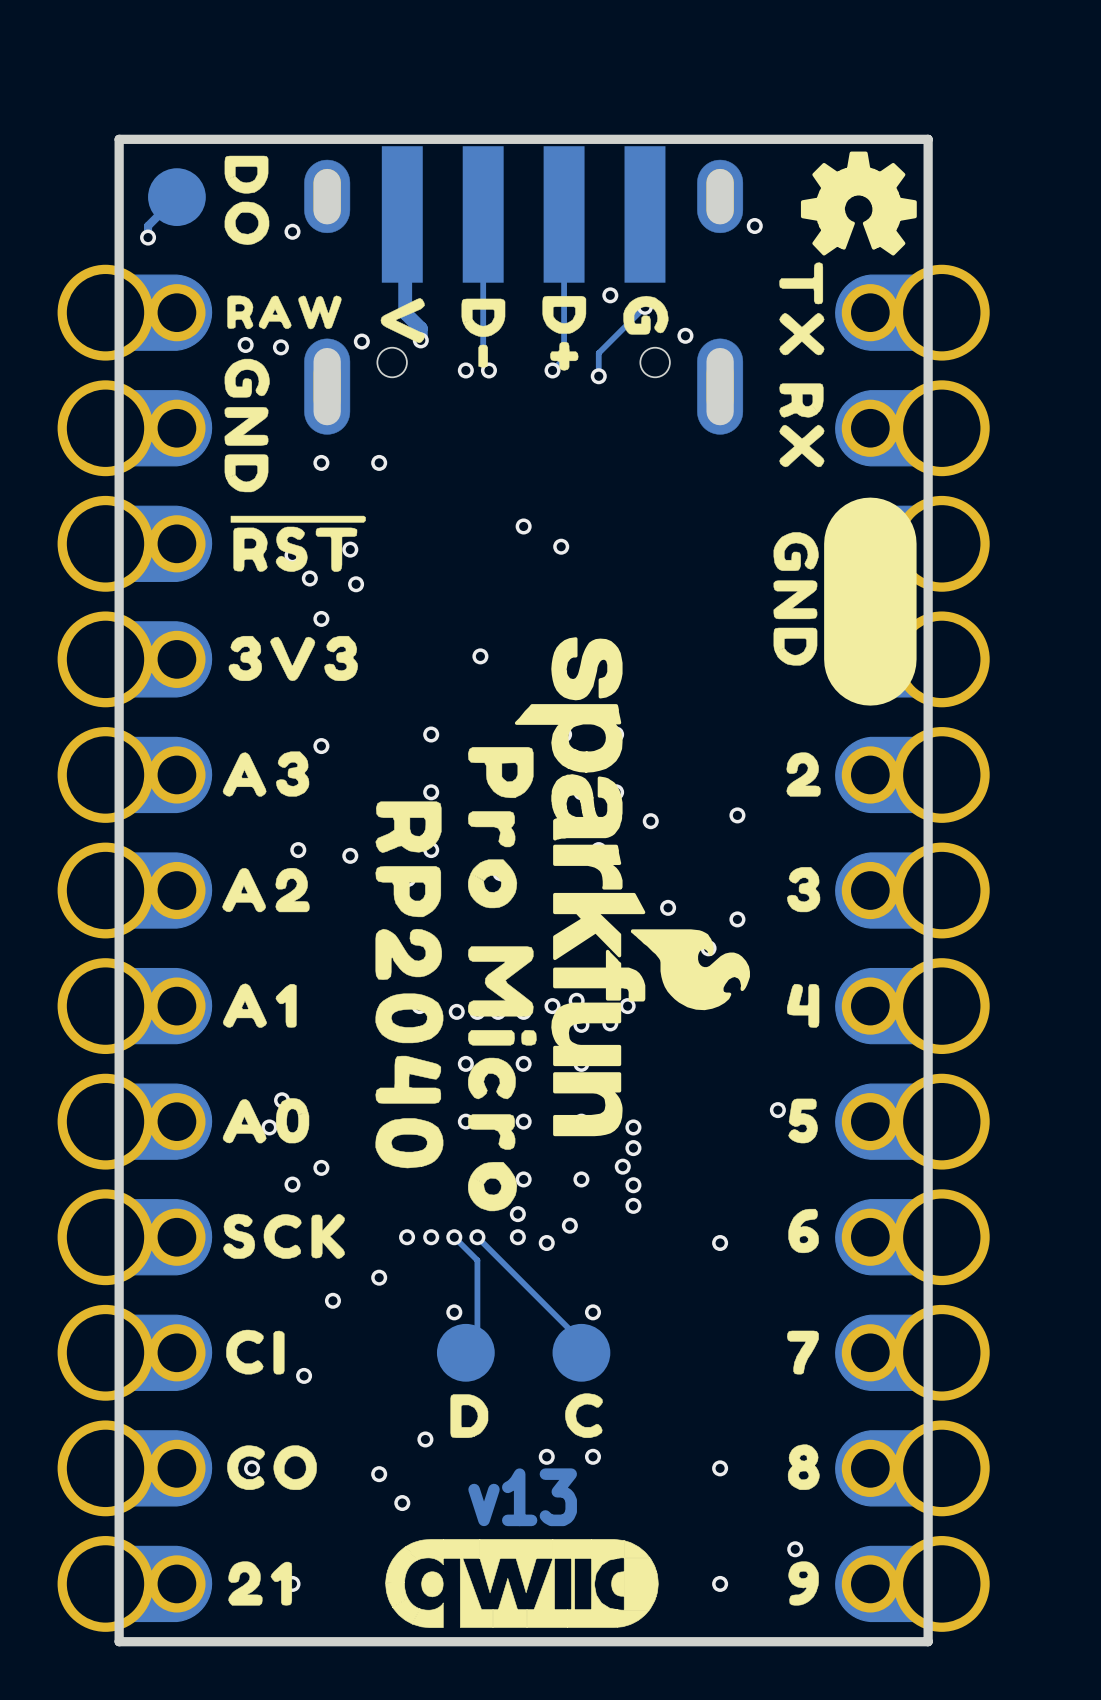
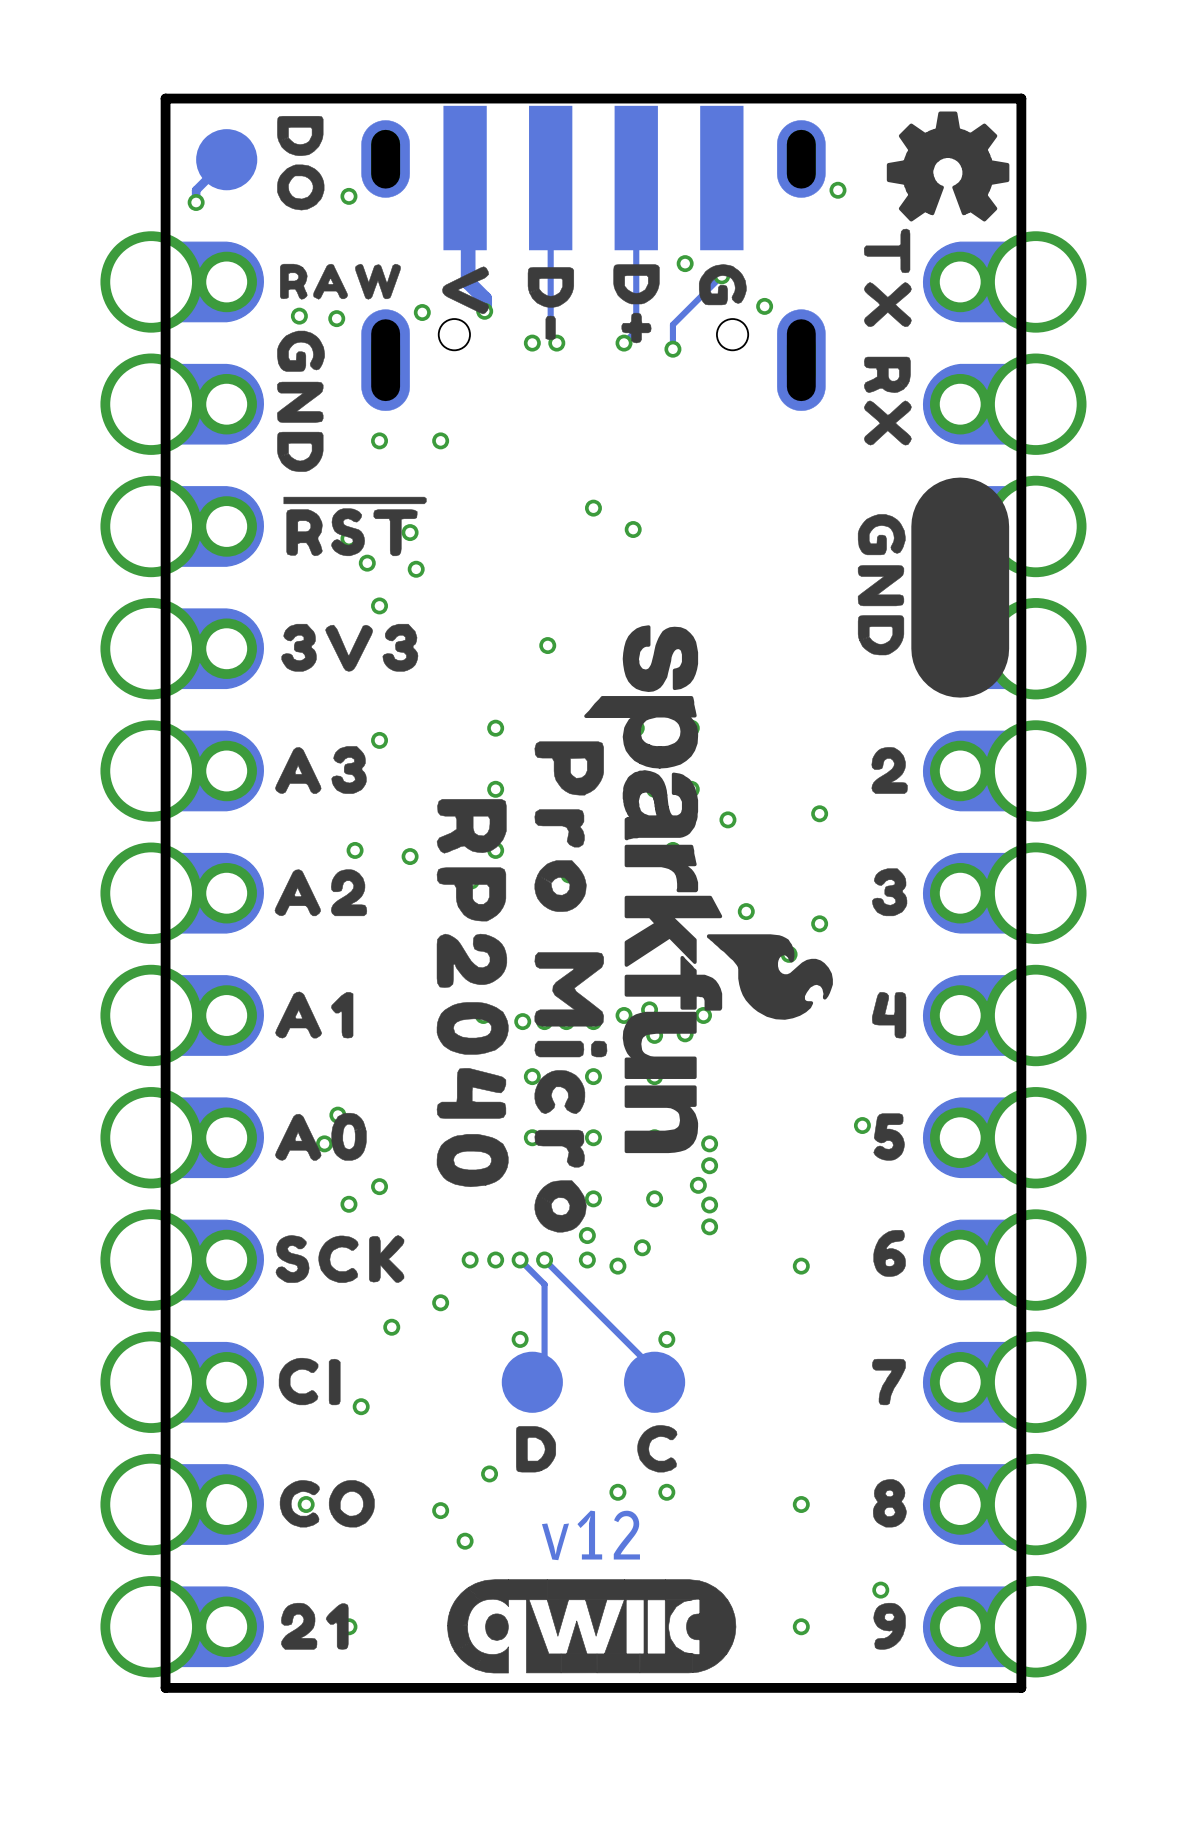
text: v13 (522, 1497) -> v12 (590, 1535)

